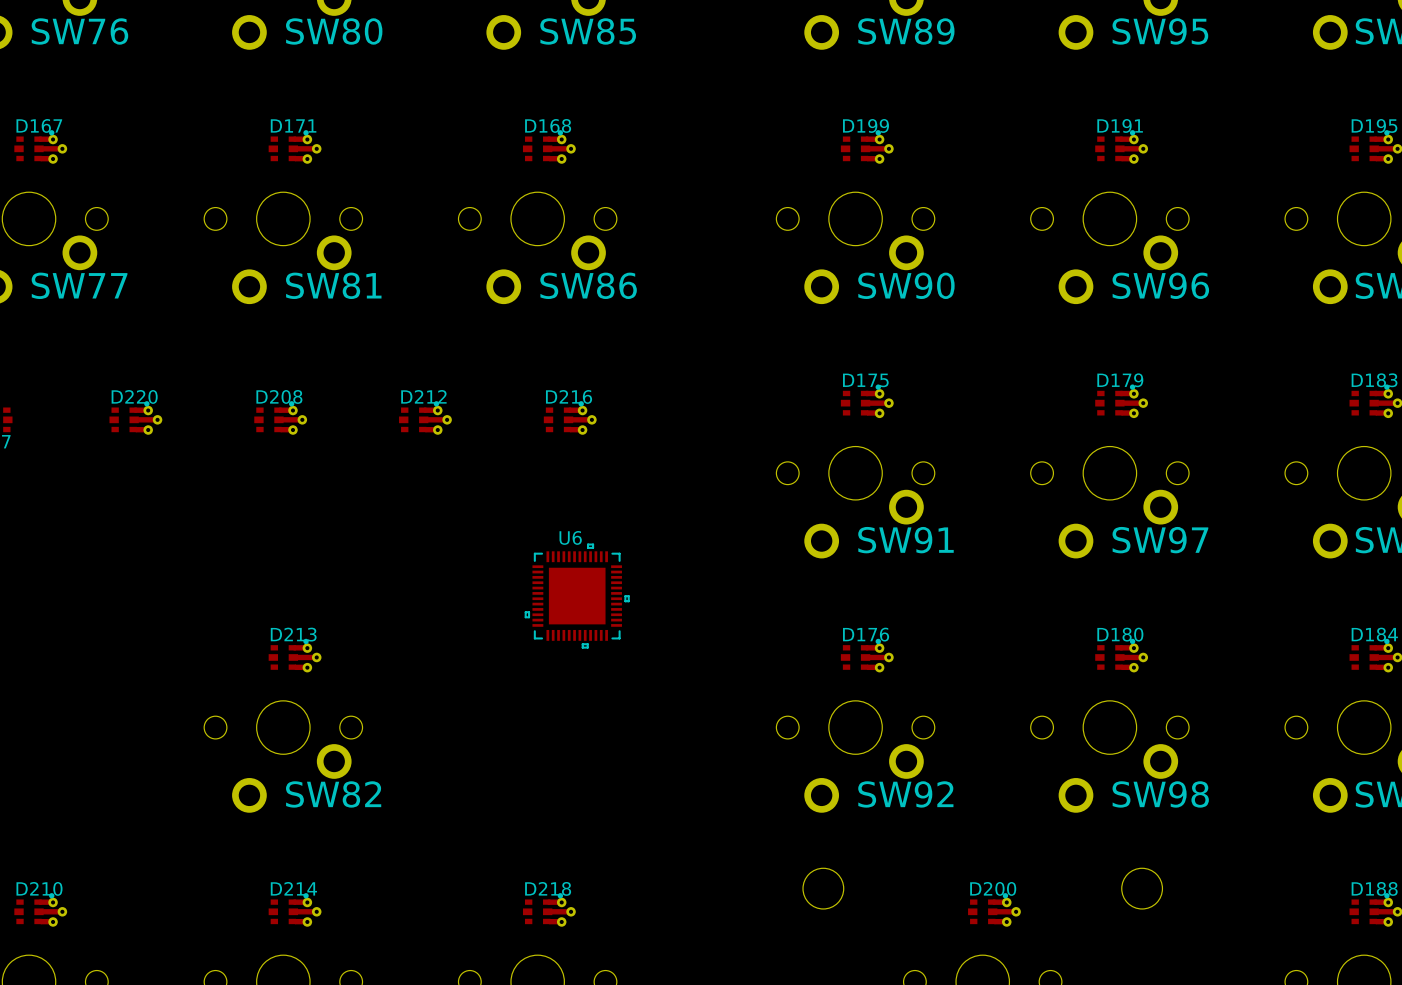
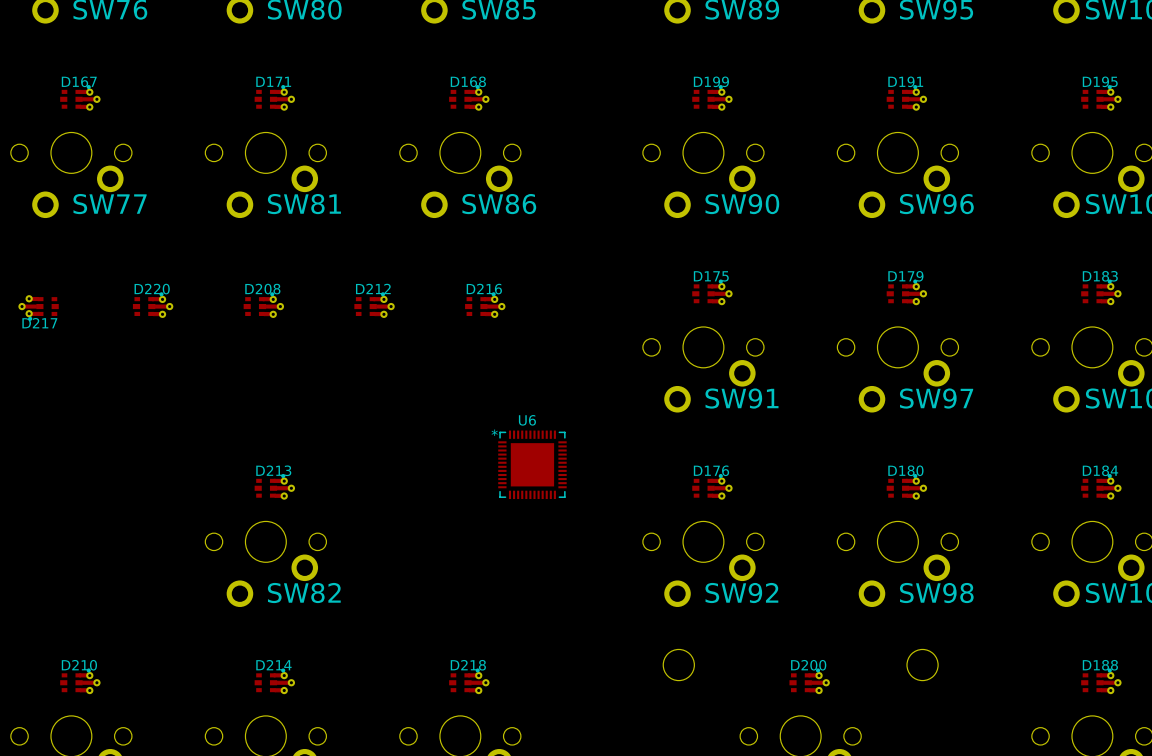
U6 footprint: [524, 543, 630, 649] -> [498, 430, 567, 500]

